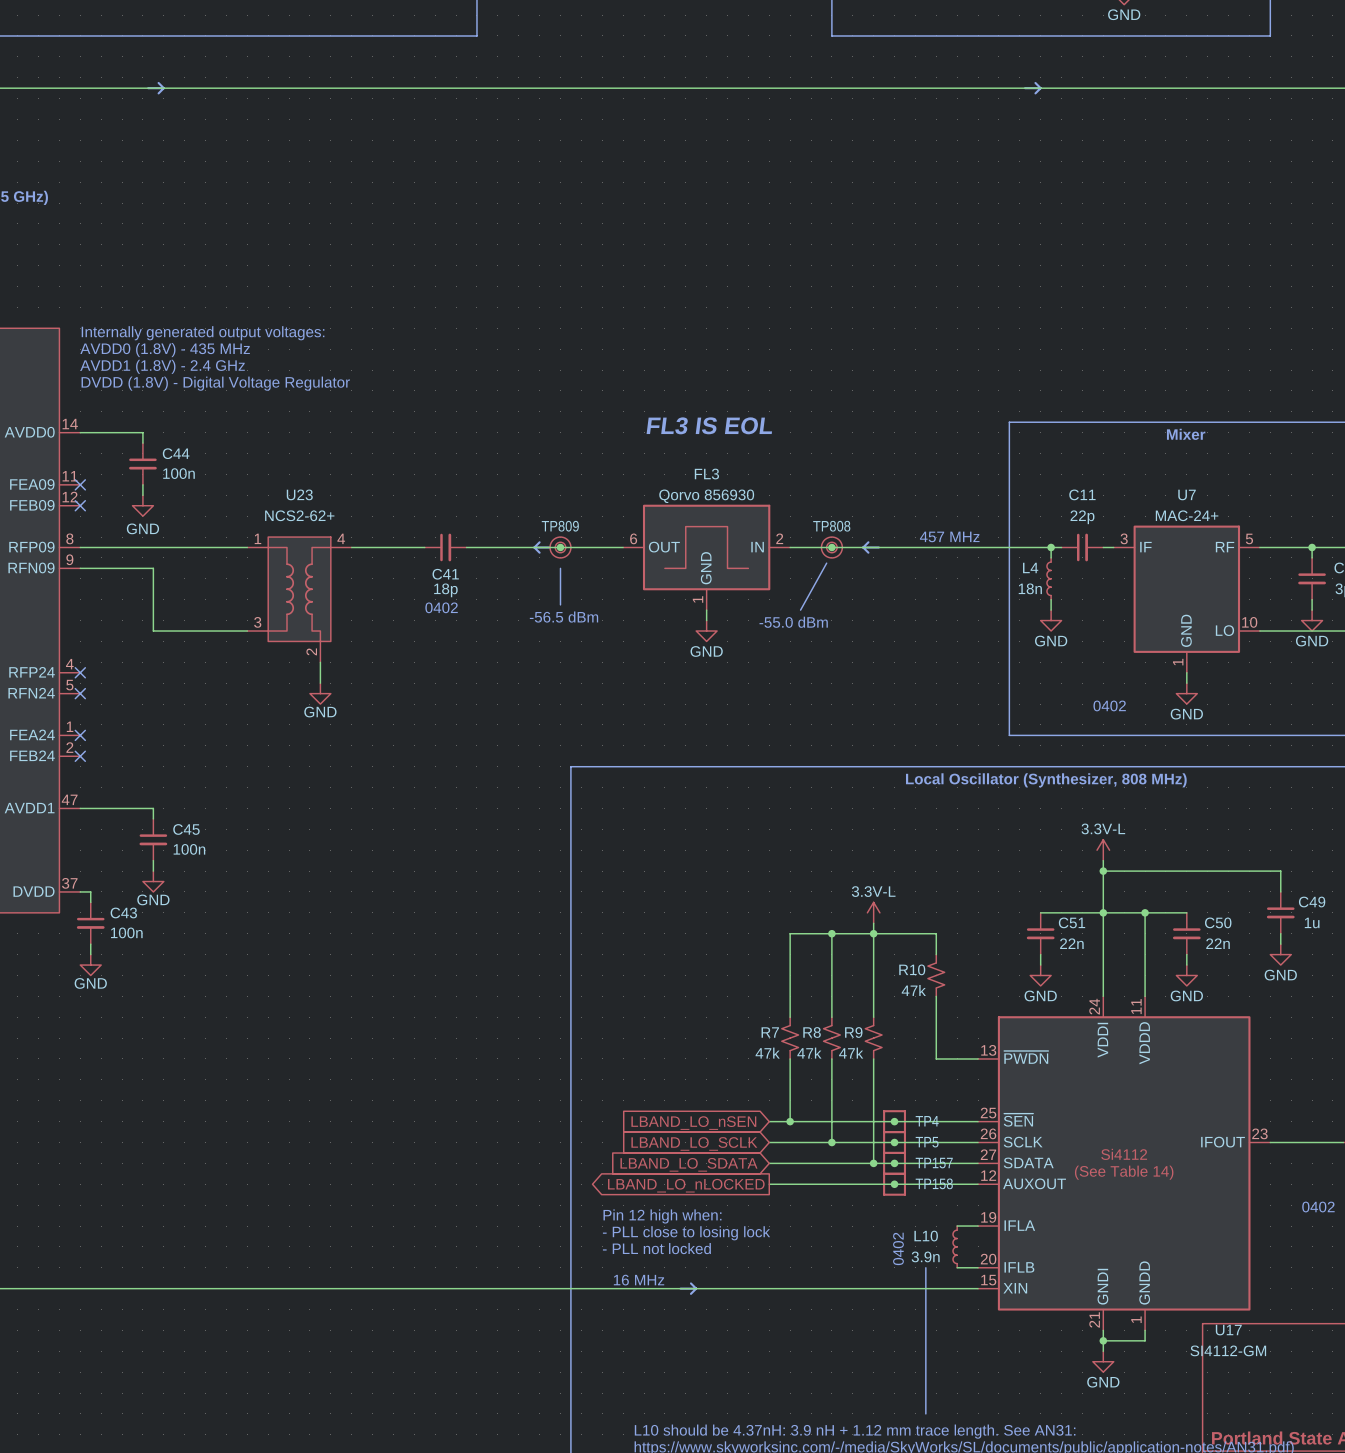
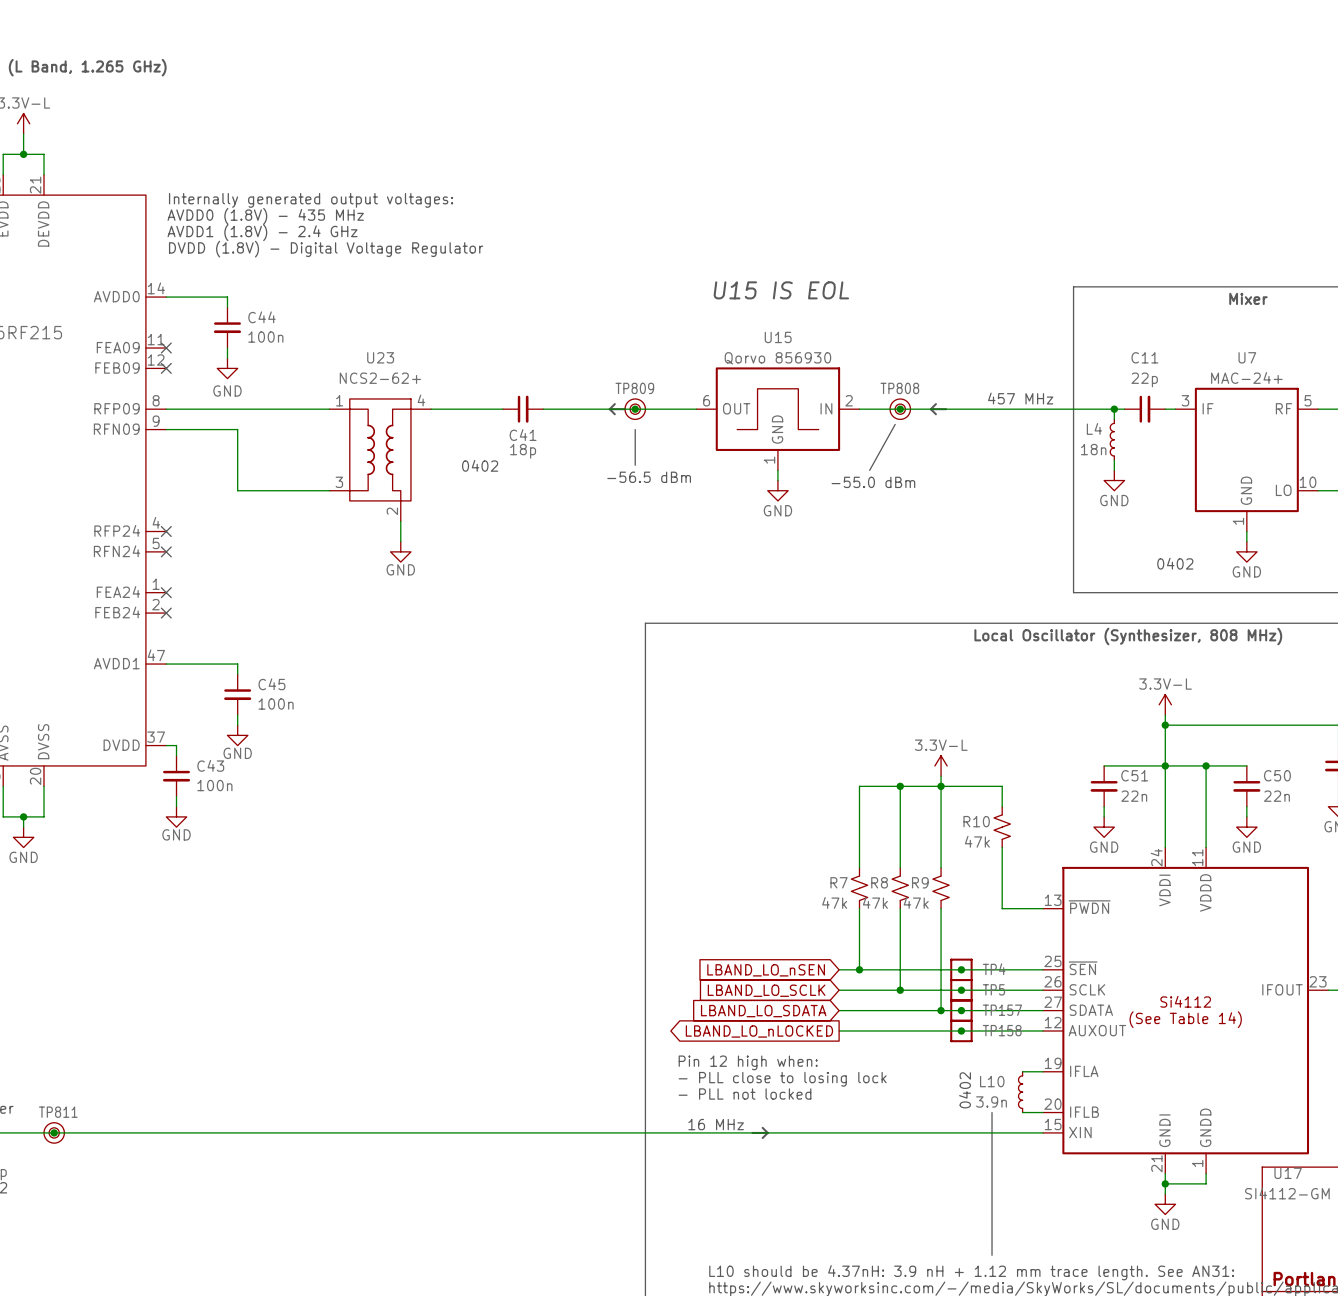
text: FL3 IS EOL (709, 425) -> U15 IS EOL (781, 290)
FL3 name: FL3 (706, 474) -> U15 (778, 337)
text position: 0402 (441, 607) -> 0402 (480, 465)

